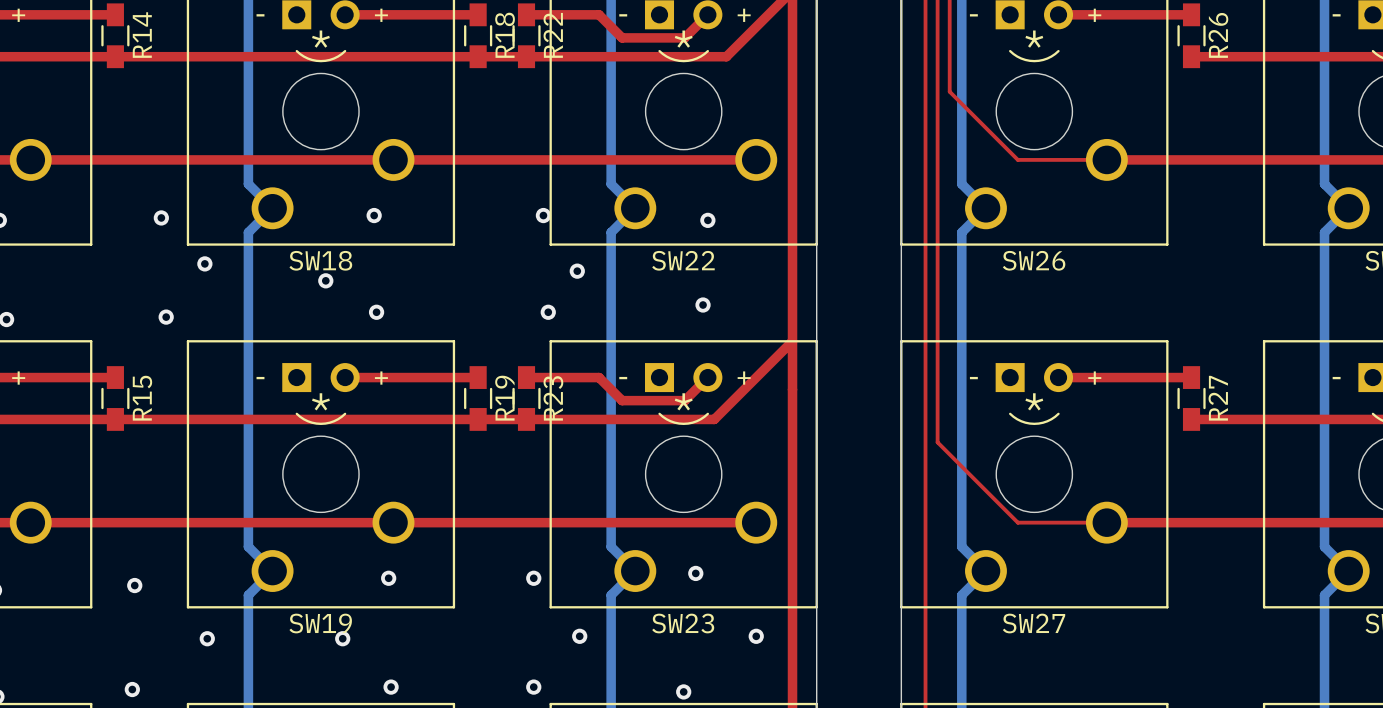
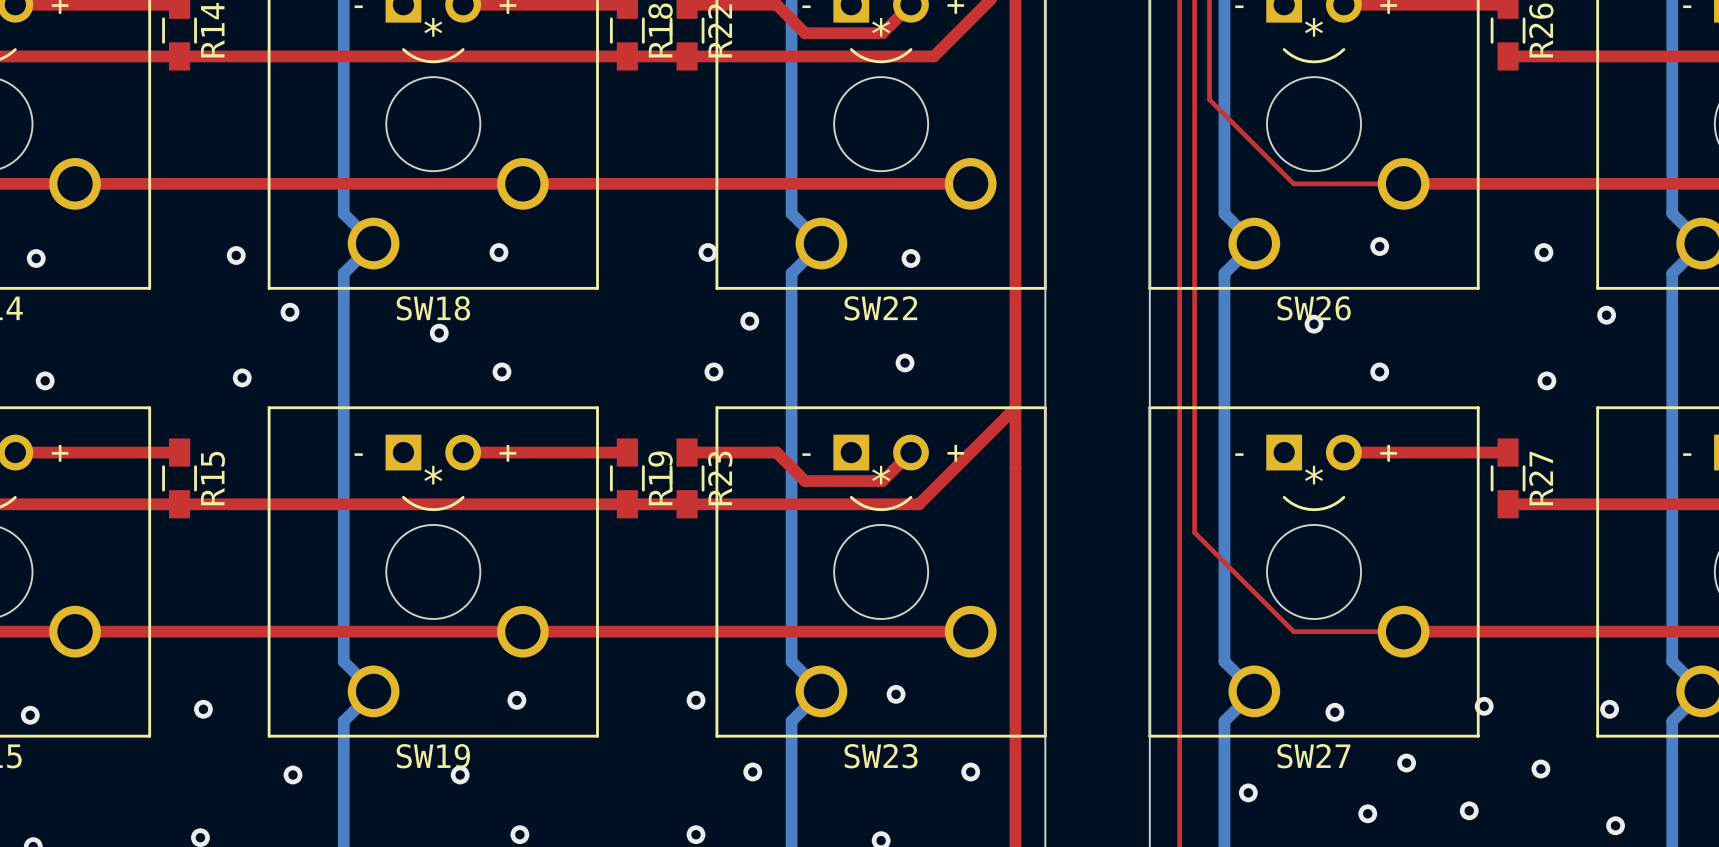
via: none -> (1379, 246)
via: none -> (1543, 252)
via: none -> (1606, 315)
via: none -> (1314, 324)
via: none -> (1379, 371)
via: none -> (1546, 380)
via: none -> (1484, 706)
via: none -> (1609, 709)
via: none -> (1334, 712)
via: none -> (1406, 763)
via: none -> (1540, 769)
via: none -> (1248, 792)
via: none -> (1469, 810)
via: none -> (1367, 813)
via: none -> (1615, 825)

